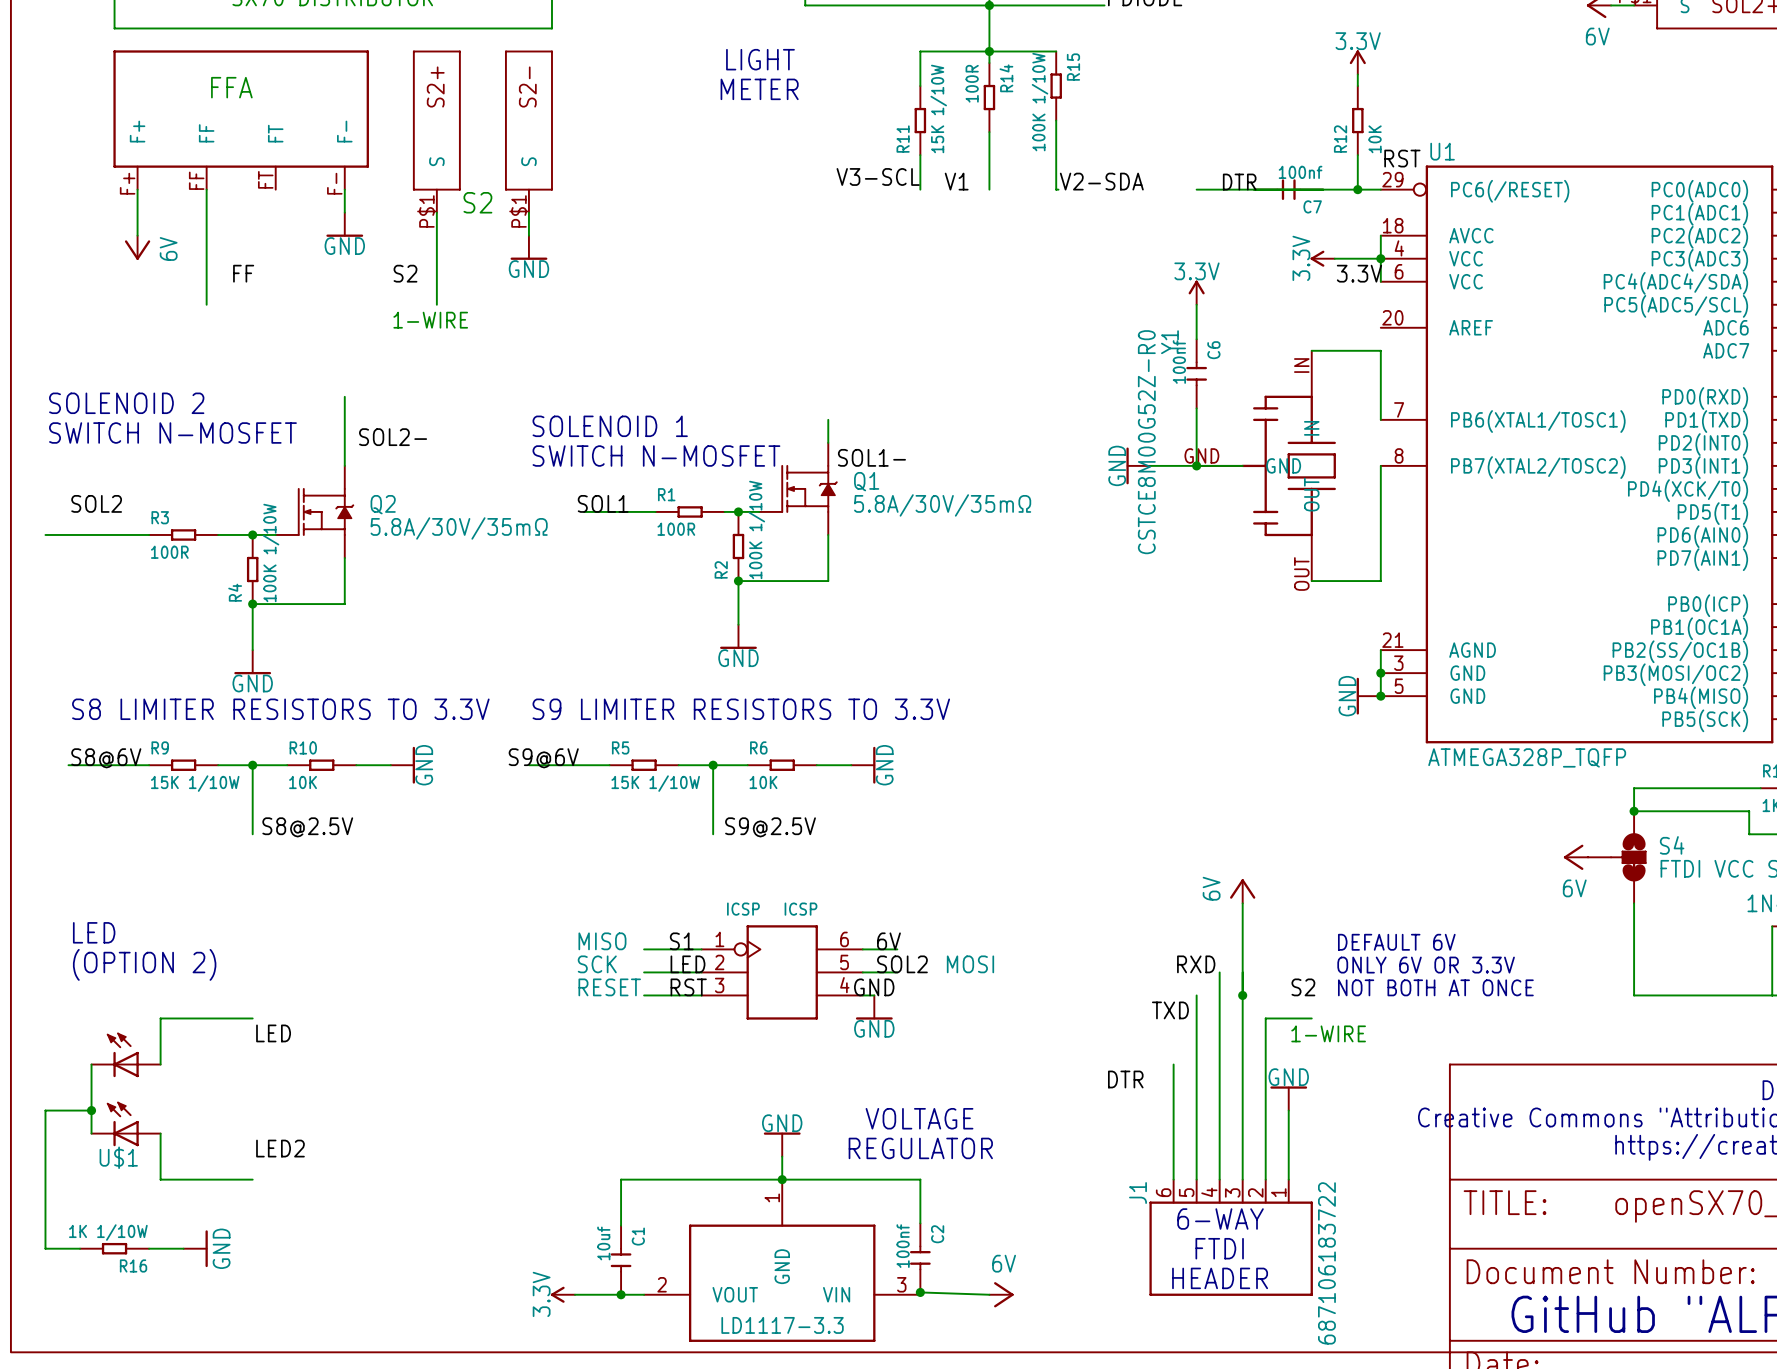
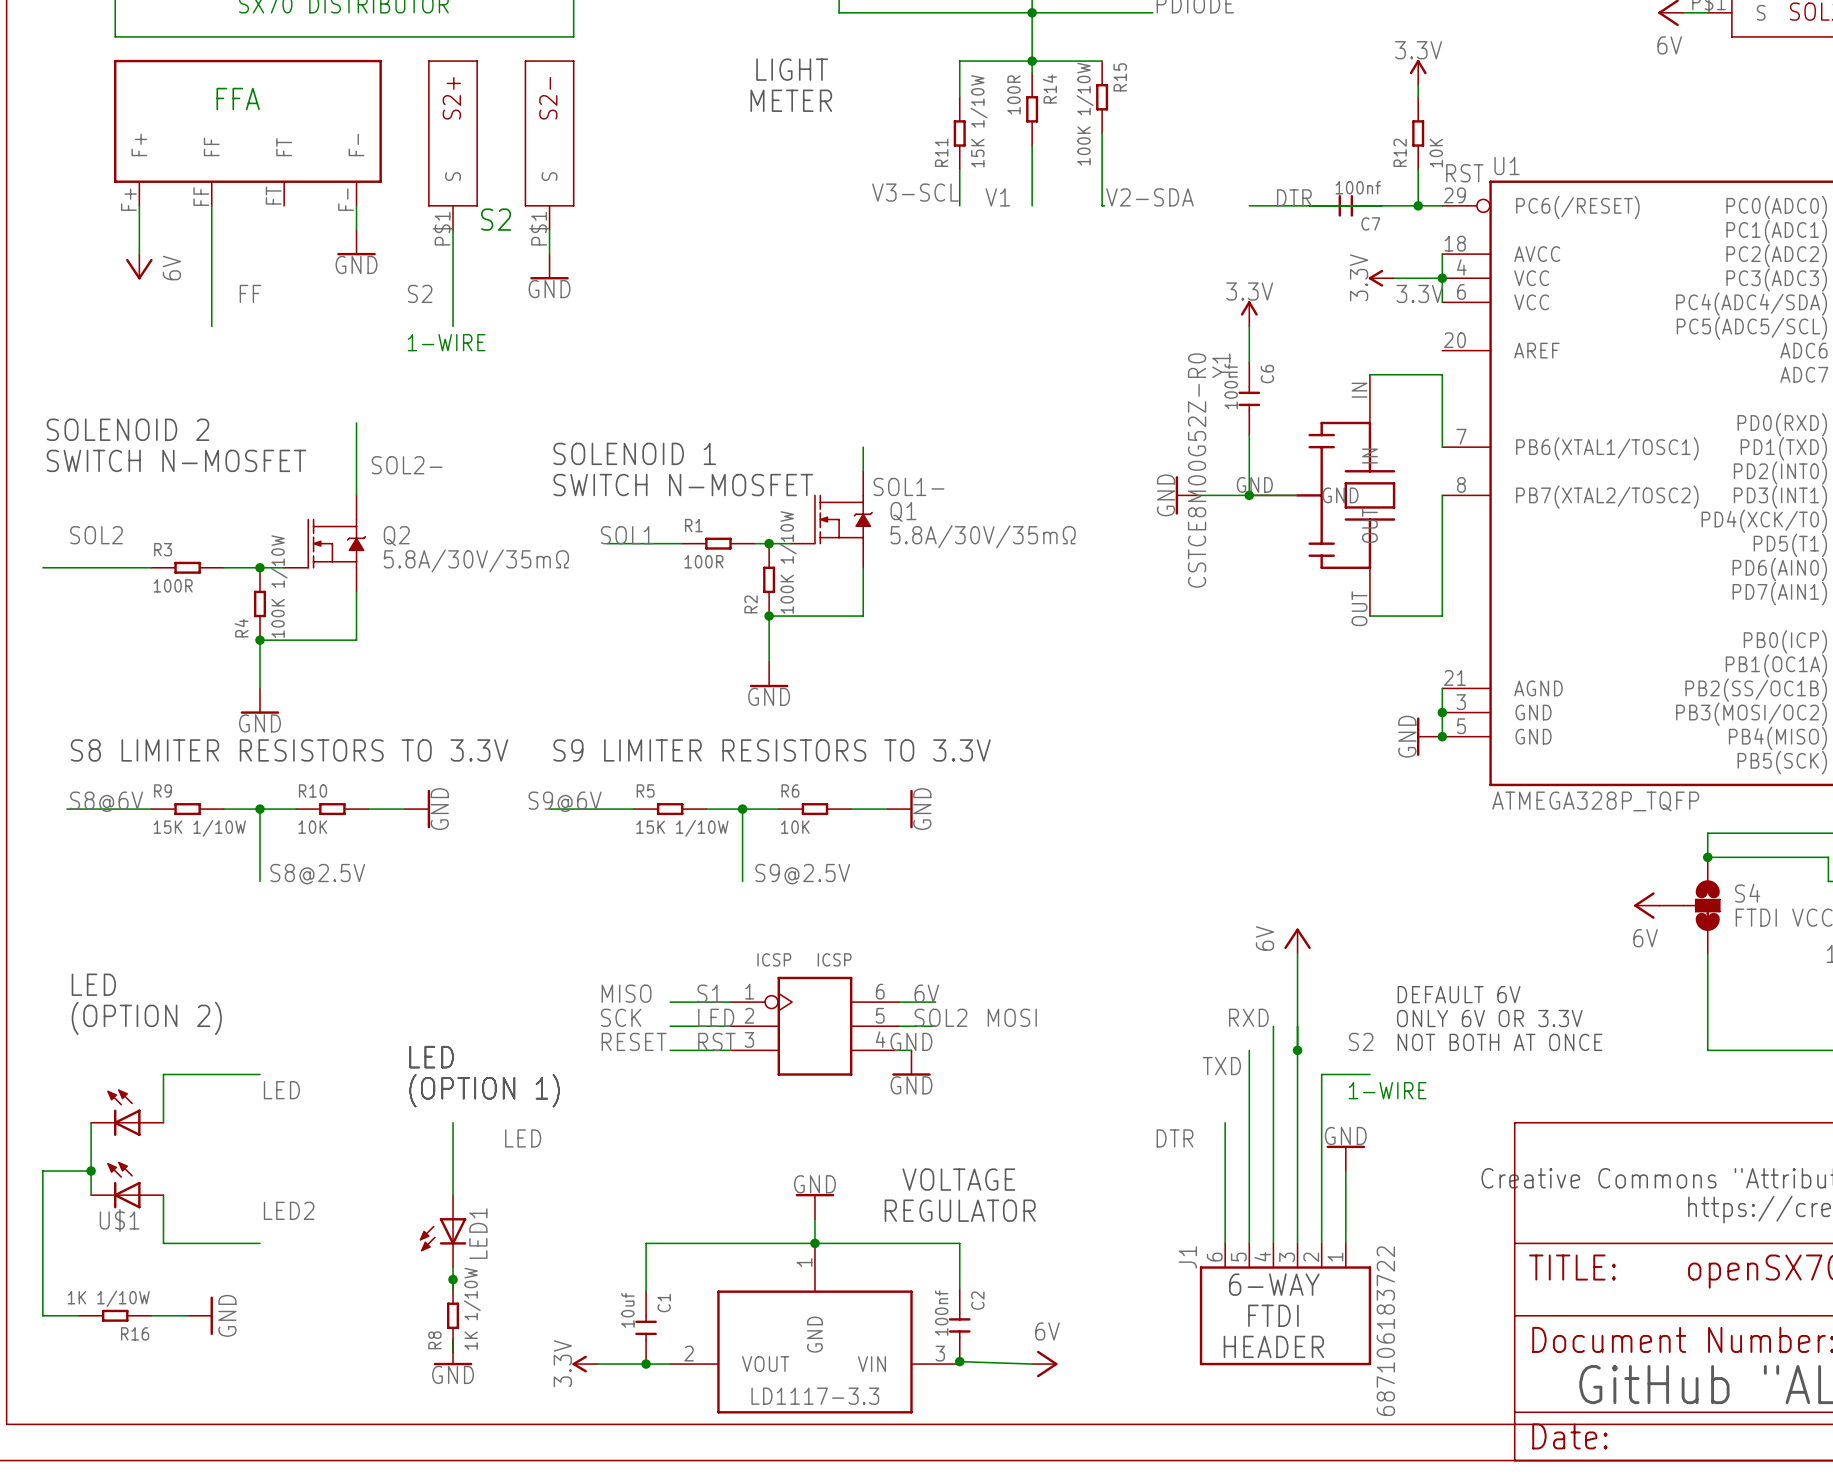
text: none -> LED (431, 1057)
text: none -> (OPTION 1) (484, 1090)
wire: none -> (453, 1122) (453, 1195)
label: none -> LED (523, 1138)
LED1: none -> (443, 1231)
wire: none -> (453, 1267) (453, 1291)
junction: none -> (453, 1279)
R8: none -> 1K 1/10W (453, 1315)
wire: none -> (453, 1339) (453, 1351)
power symbol: none -> GND (453, 1352)

